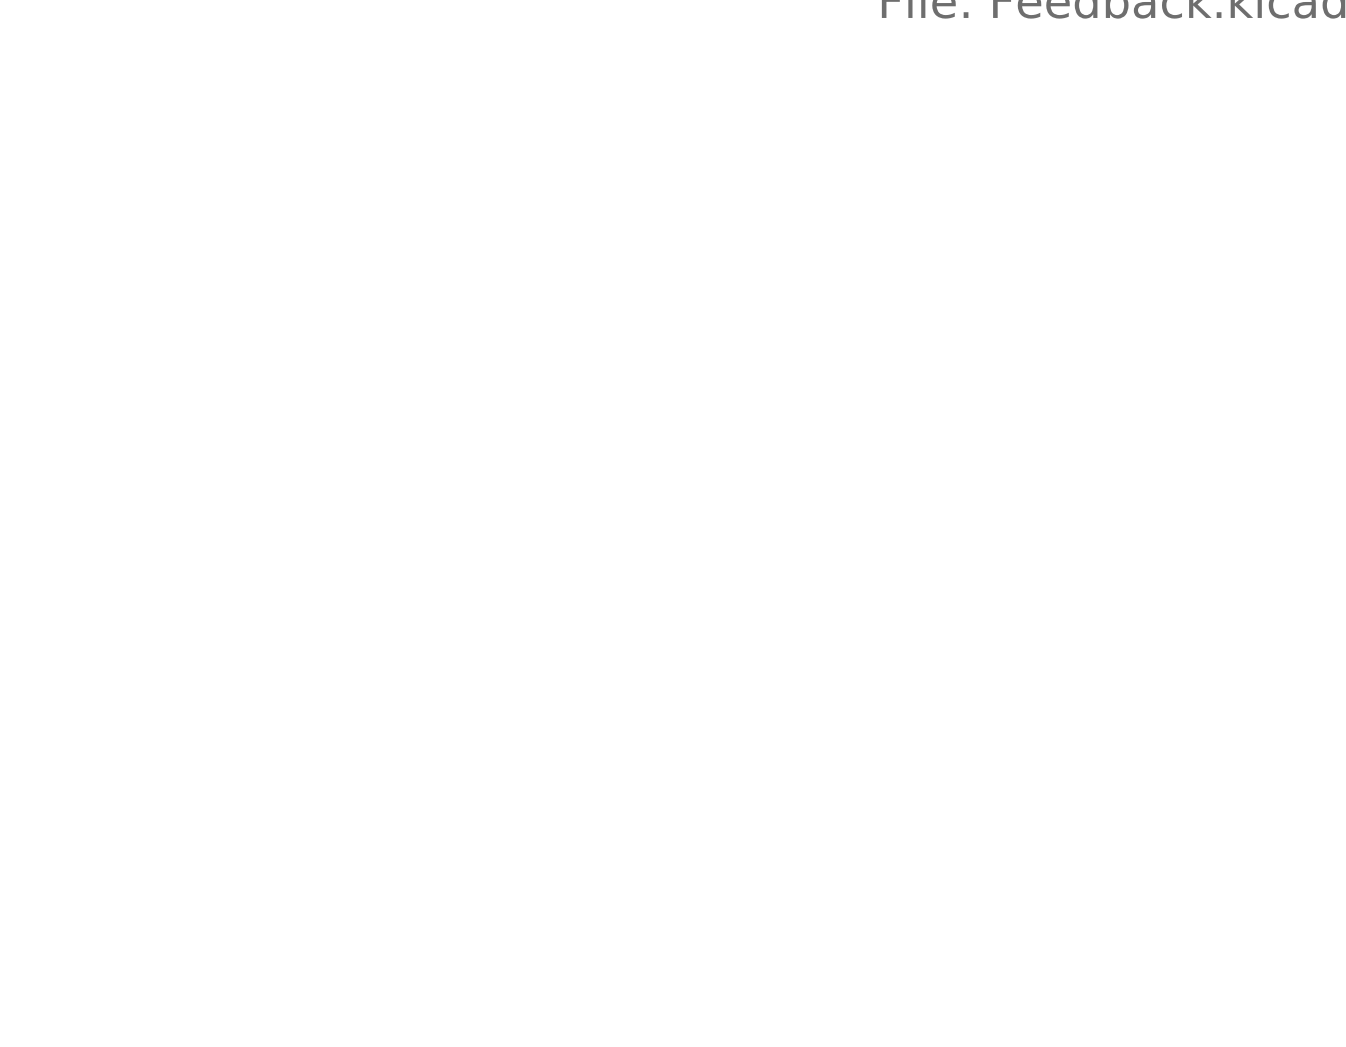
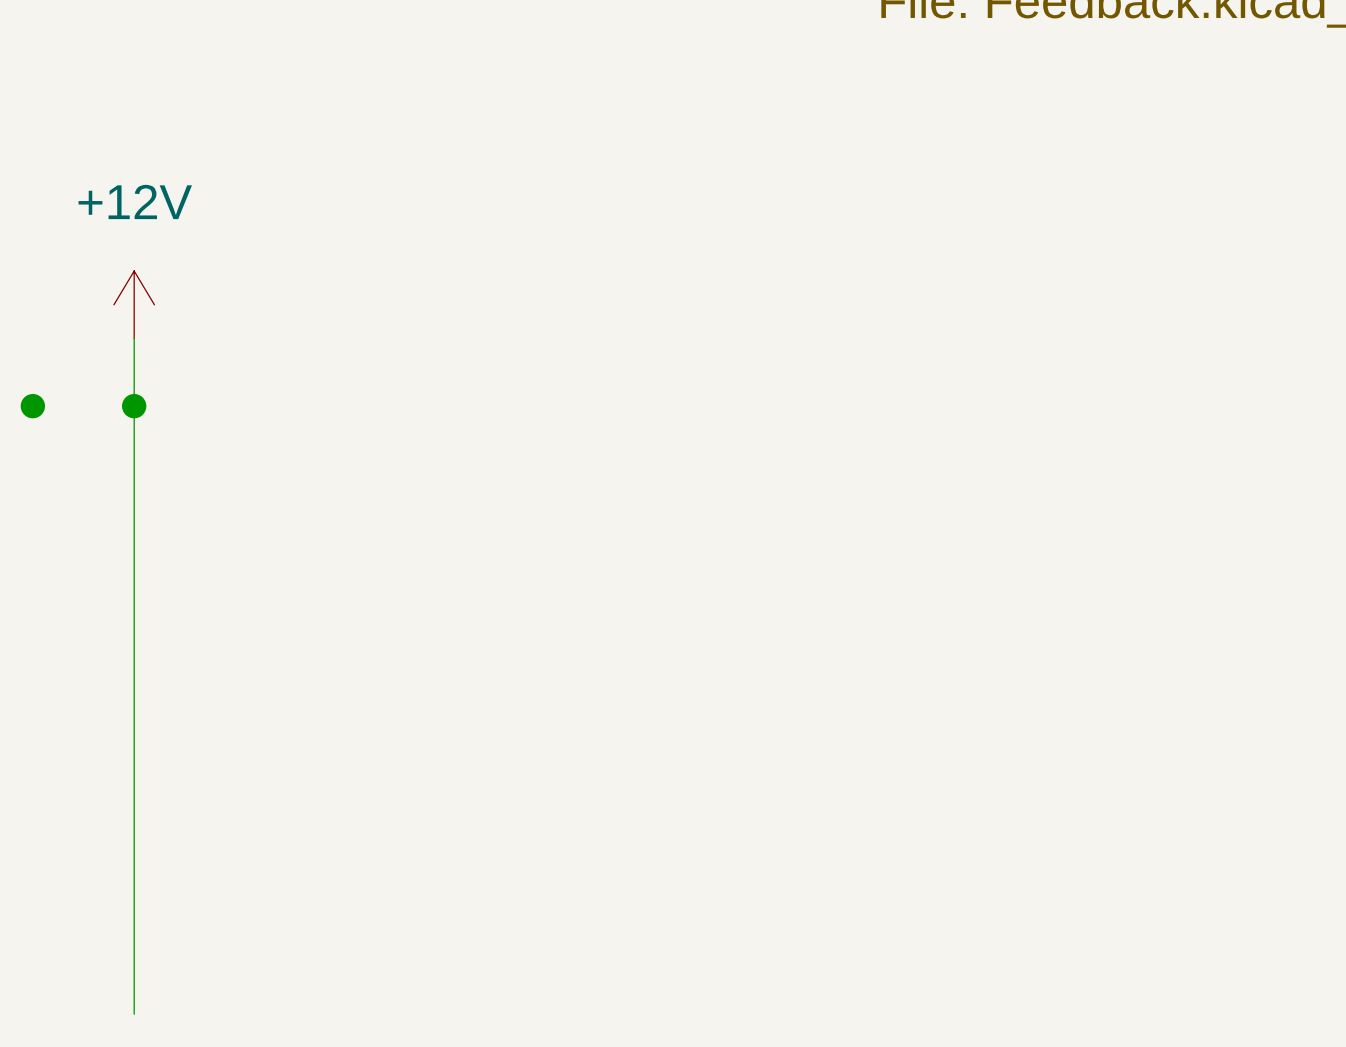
power symbol: none -> +12V (134, 304)
wire: none -> (134, 338) (134, 1014)
junction: none -> (32, 406)
junction: none -> (134, 406)

